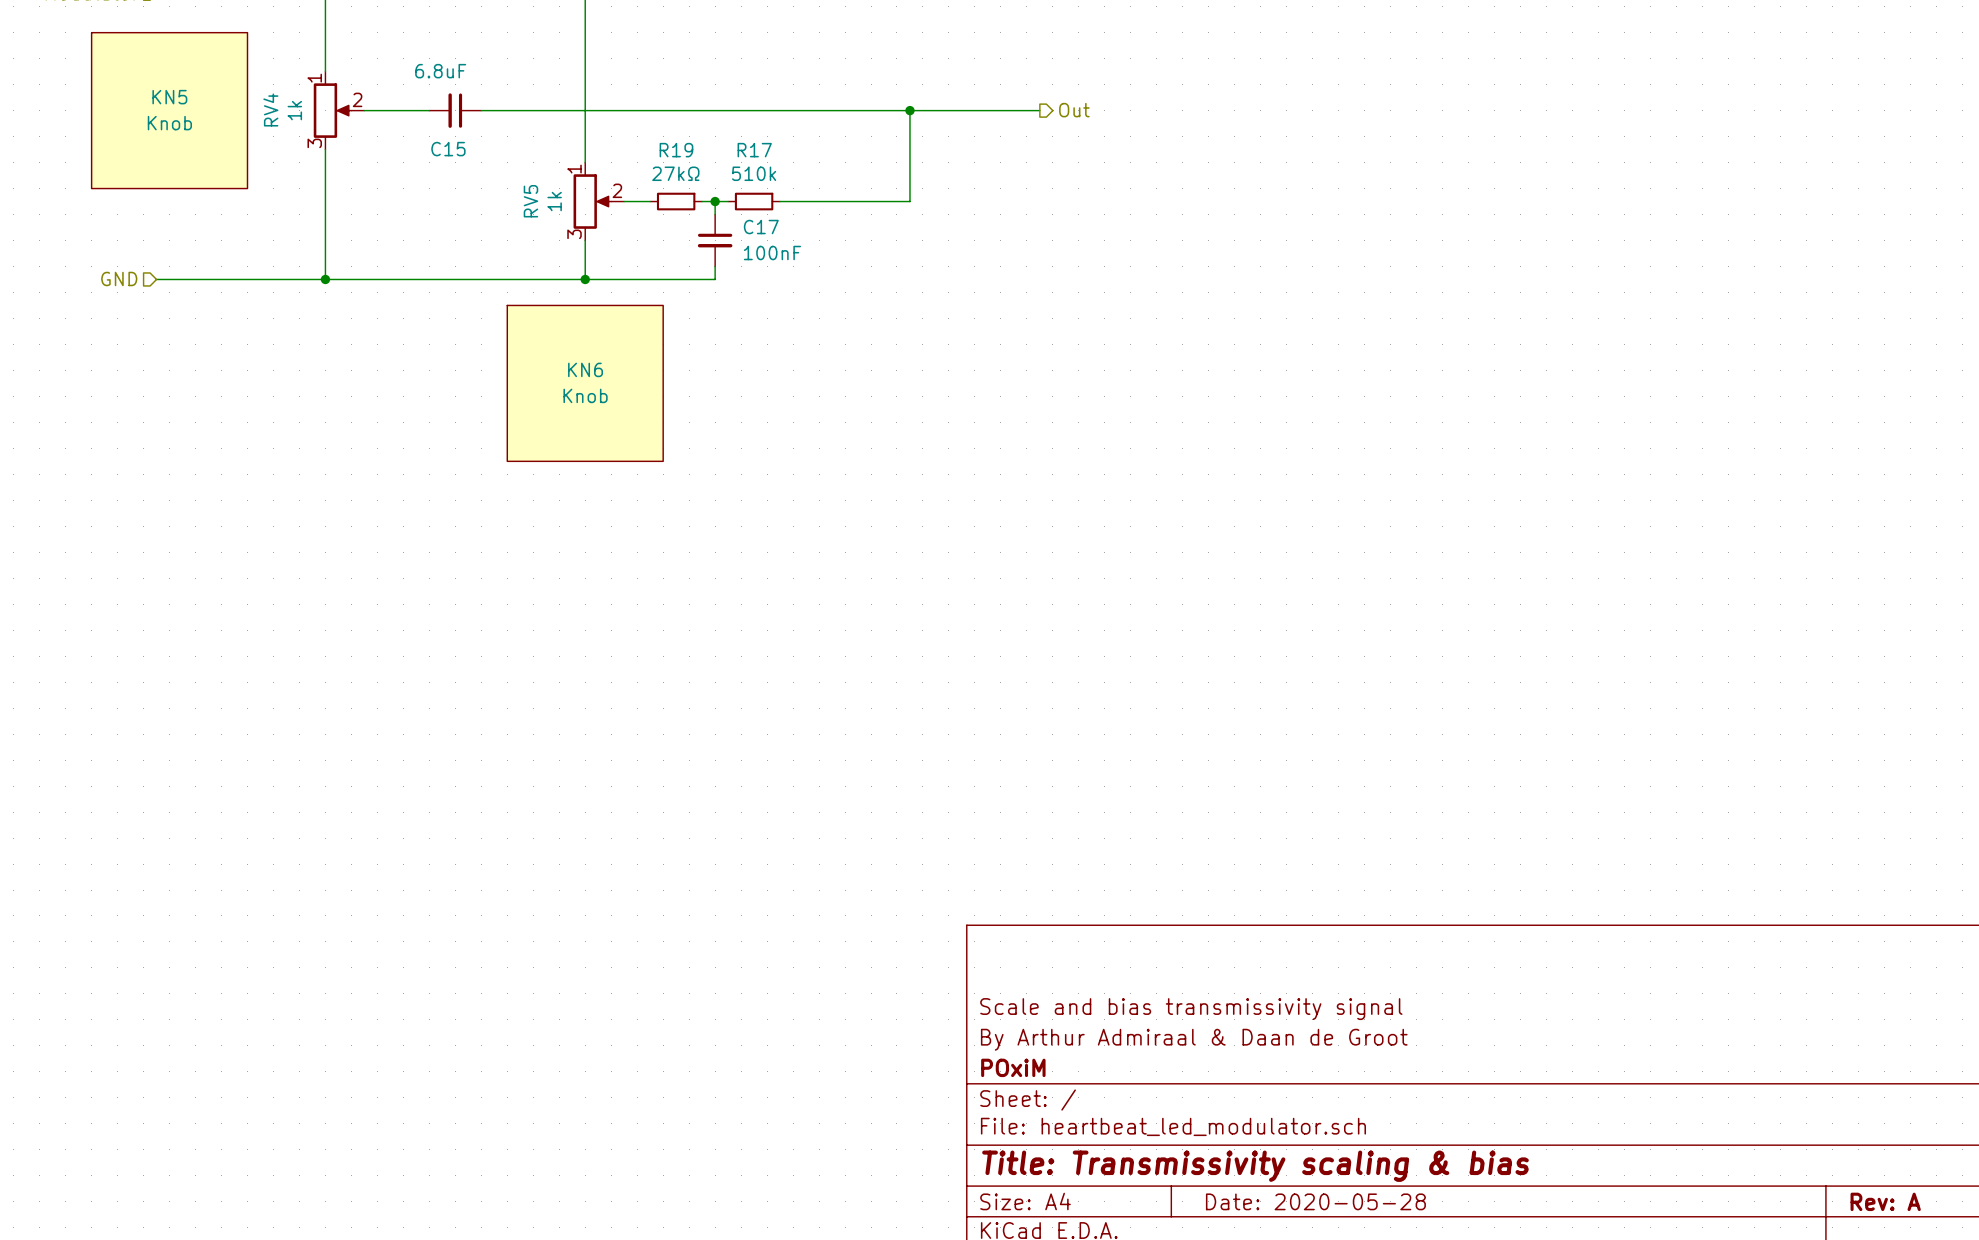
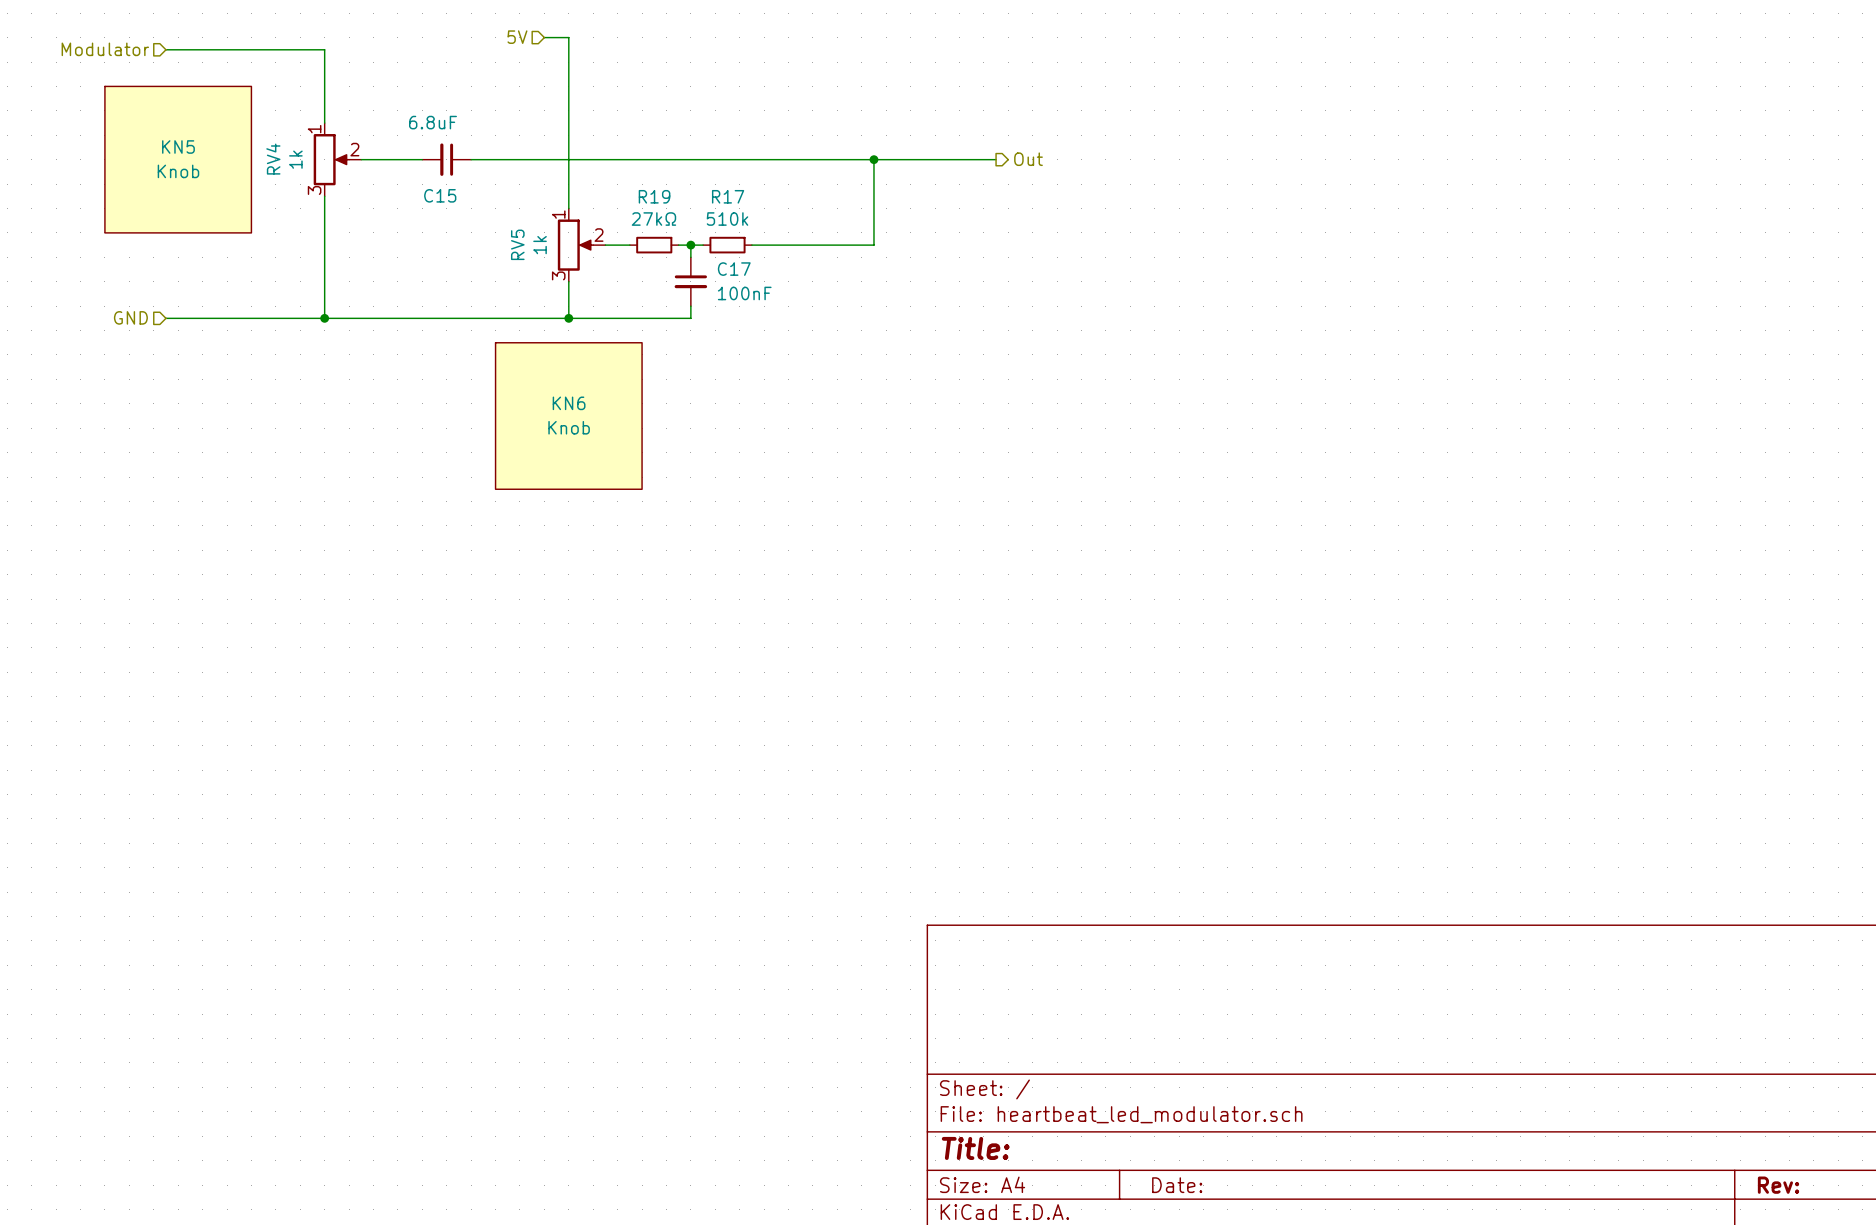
title block: Scale and bias transmissivity signal (1191, 1009) -> none
title block: By Arthur Admiraal & Daan de Groot (1194, 1039) -> none
title block: POxiM (1013, 1067) -> none
title block: Title: Transmissivity scaling & bias (1255, 1166) -> Title: (975, 1148)
title block: Date: 2020-05-28 (1315, 1201) -> Date: (1177, 1185)
title block: Rev: A (1885, 1201) -> Rev: (1778, 1185)

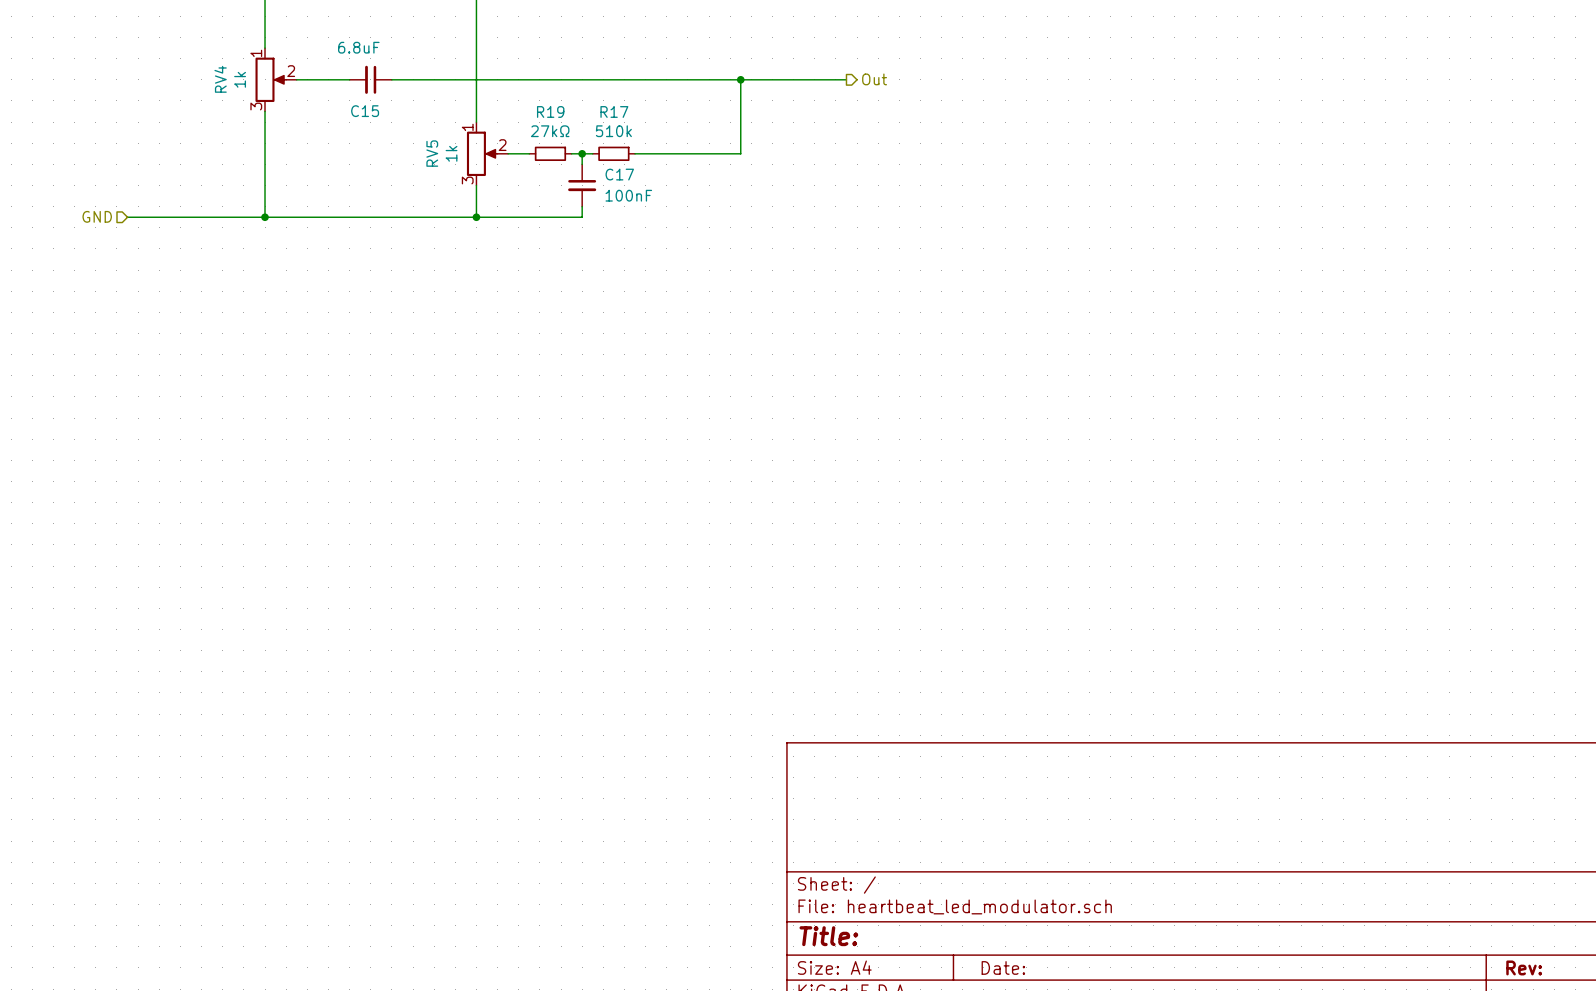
KN5: Knob (178, 159) -> none
KN6: Knob (568, 416) -> none

